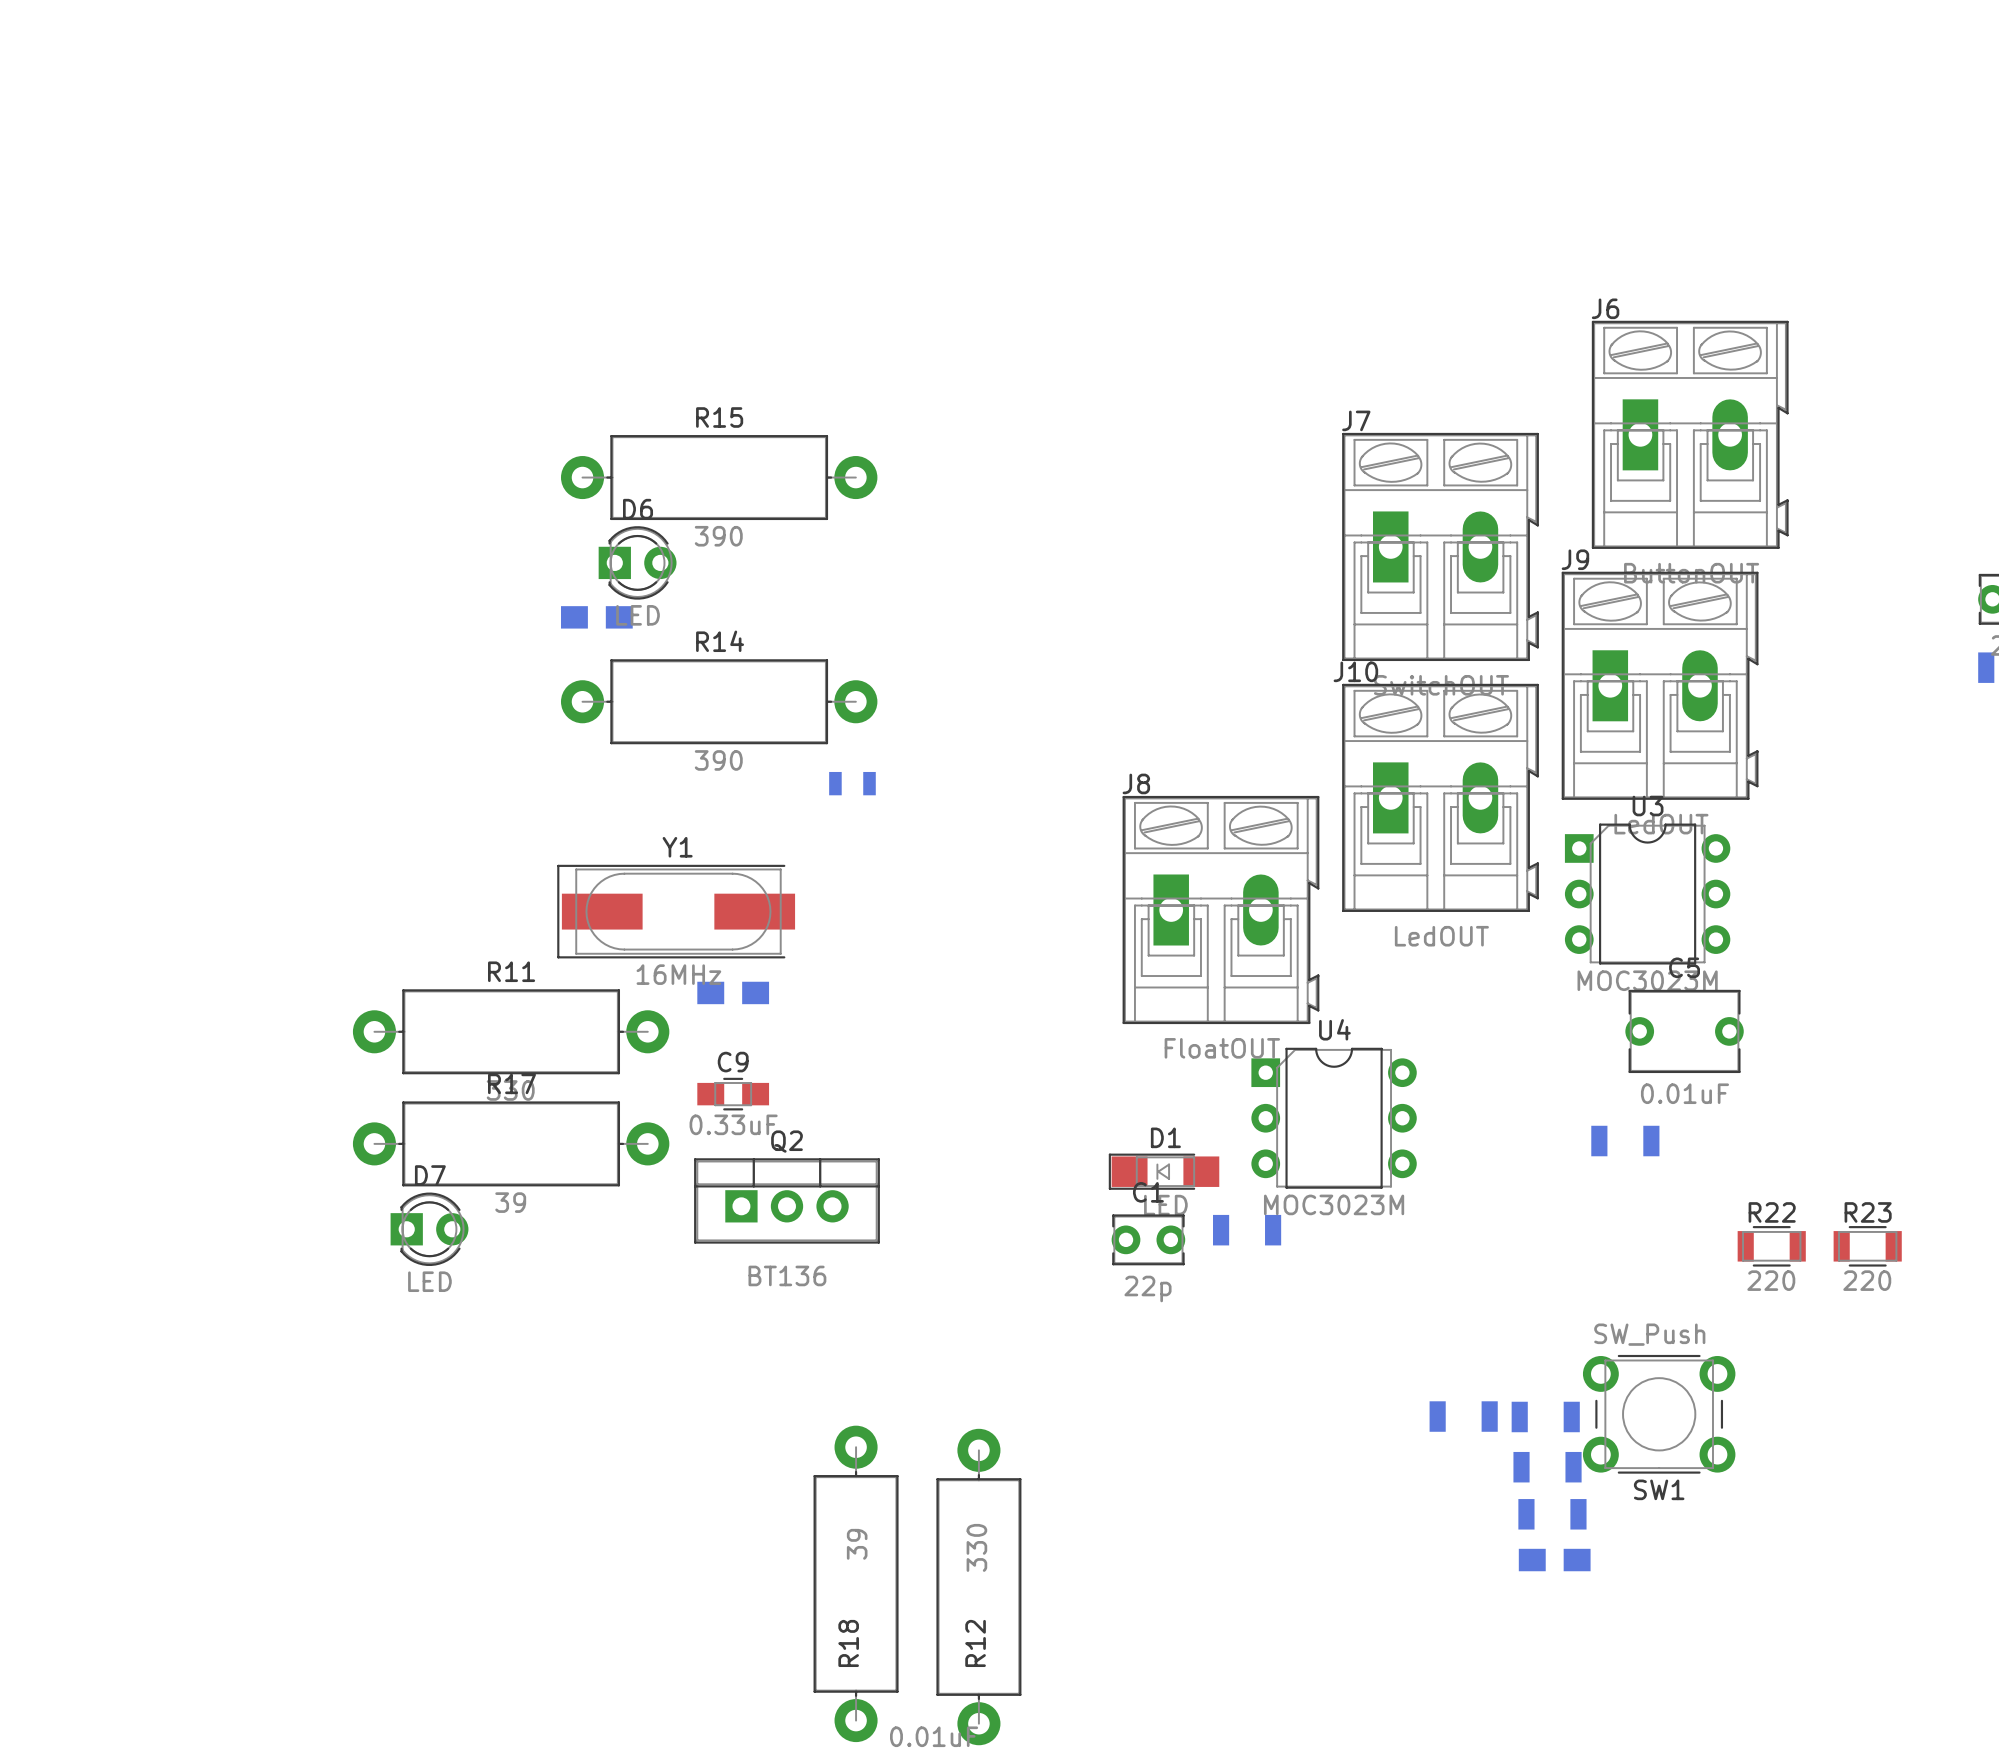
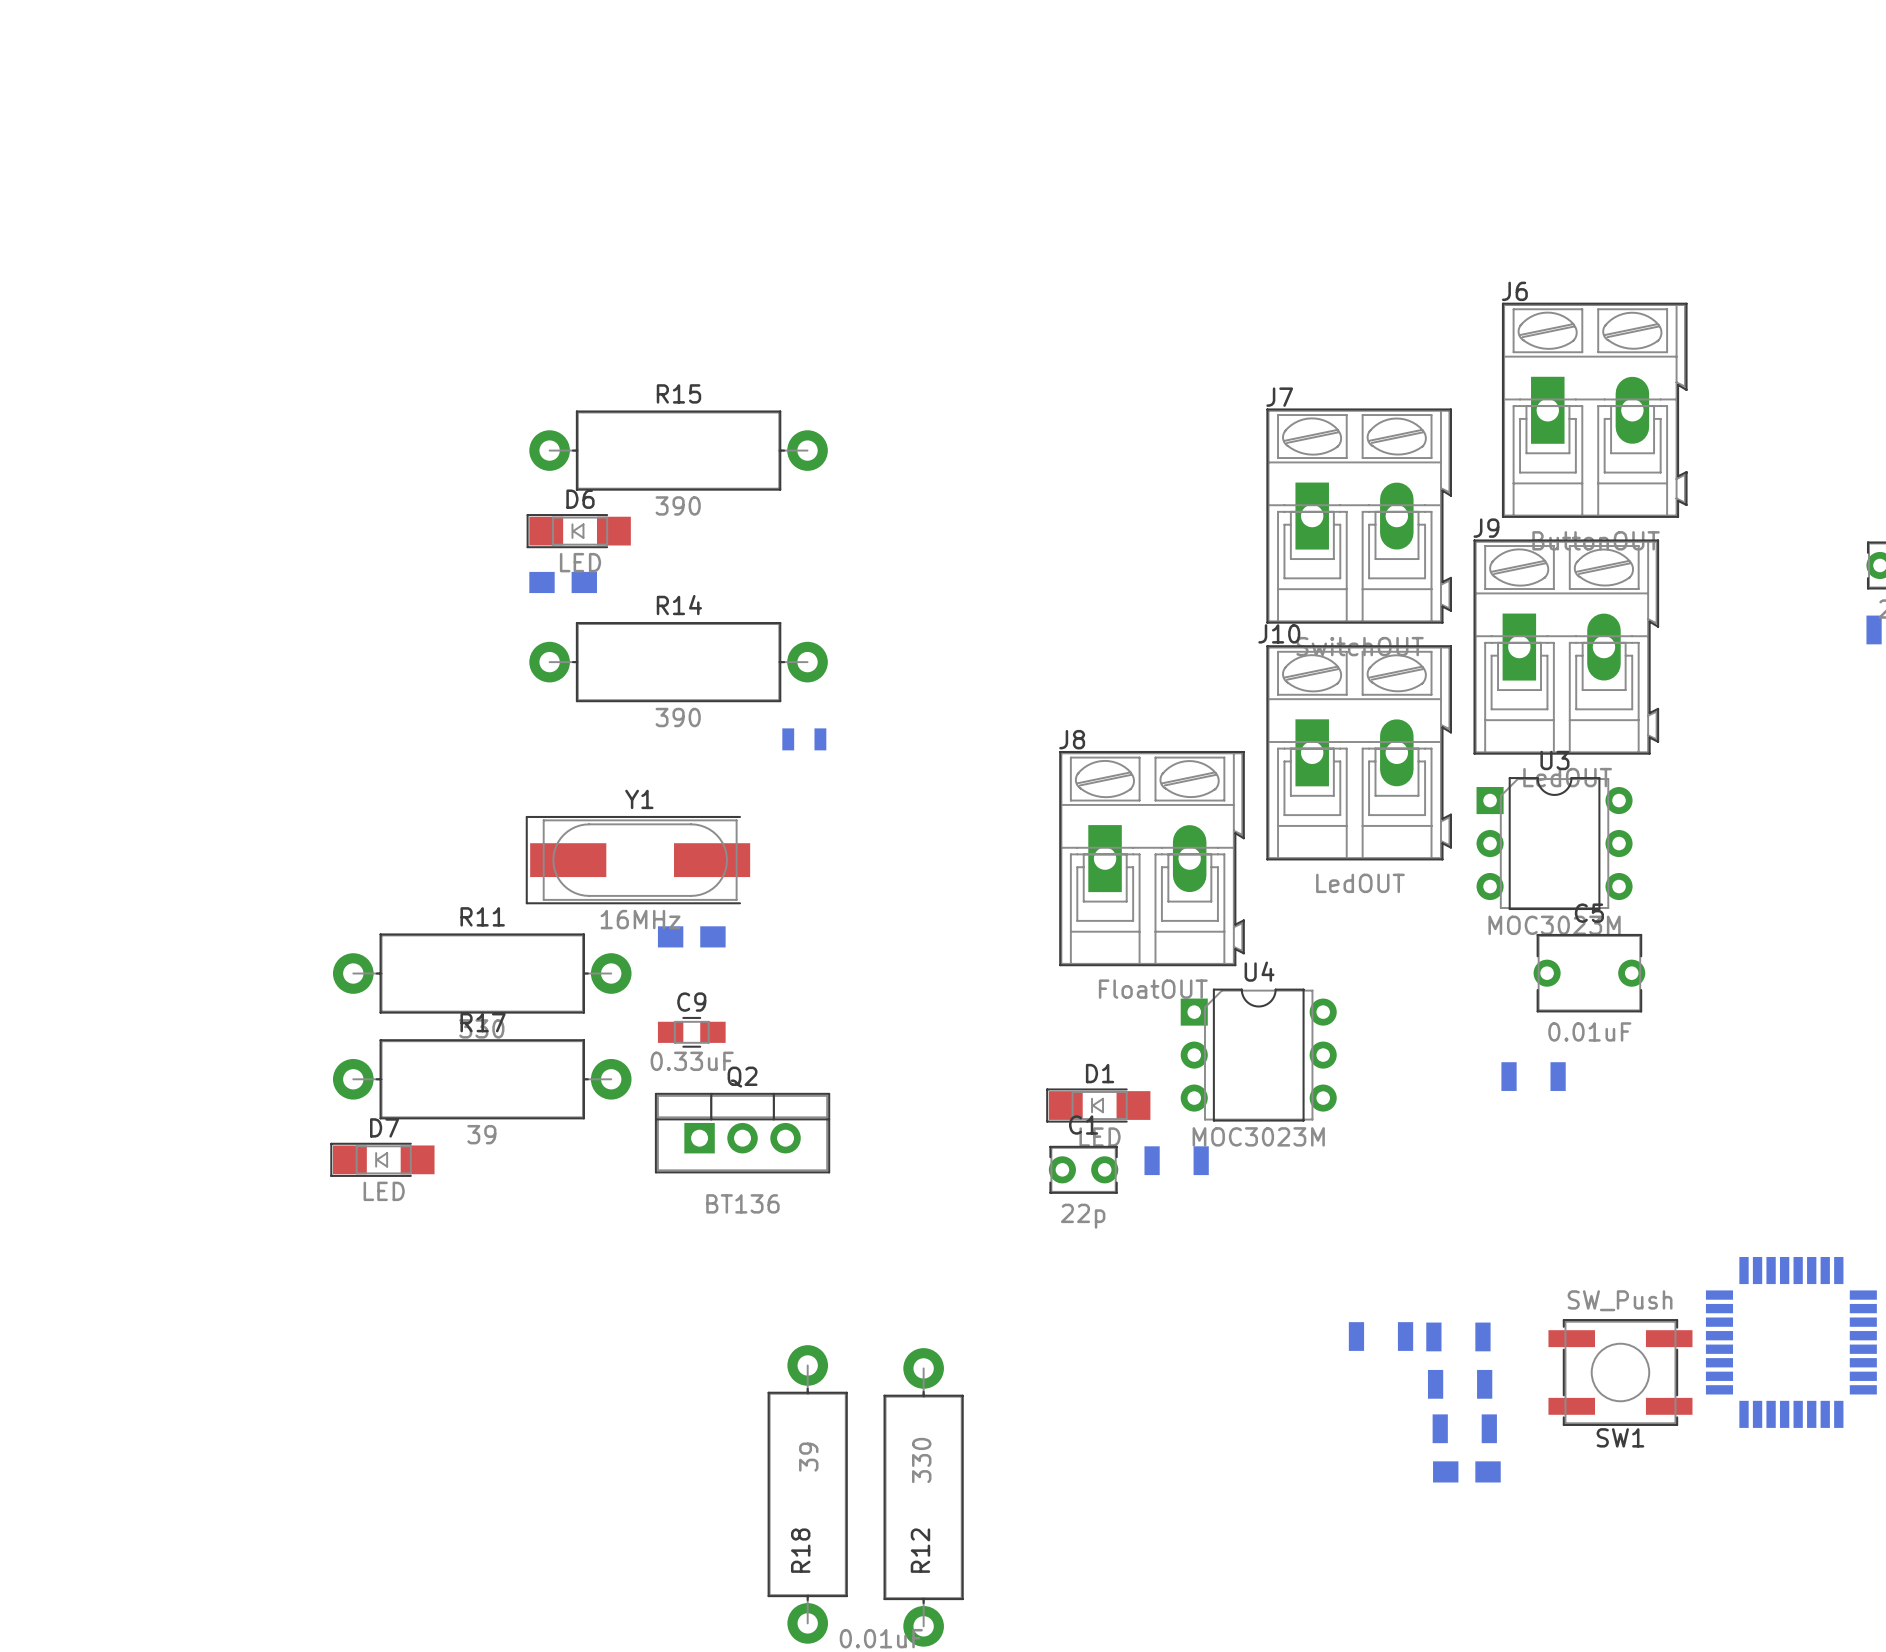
D6 footprint: [598, 526, 677, 600] -> [526, 514, 631, 549]
D7 footprint: [390, 1192, 469, 1267] -> [330, 1142, 435, 1177]
R22: 220 (1771, 1246) -> none
R23: 220 (1867, 1246) -> none
SW1 footprint: [1582, 1354, 1736, 1474] -> [1548, 1319, 1693, 1426]
part: none -> (1791, 1342)

